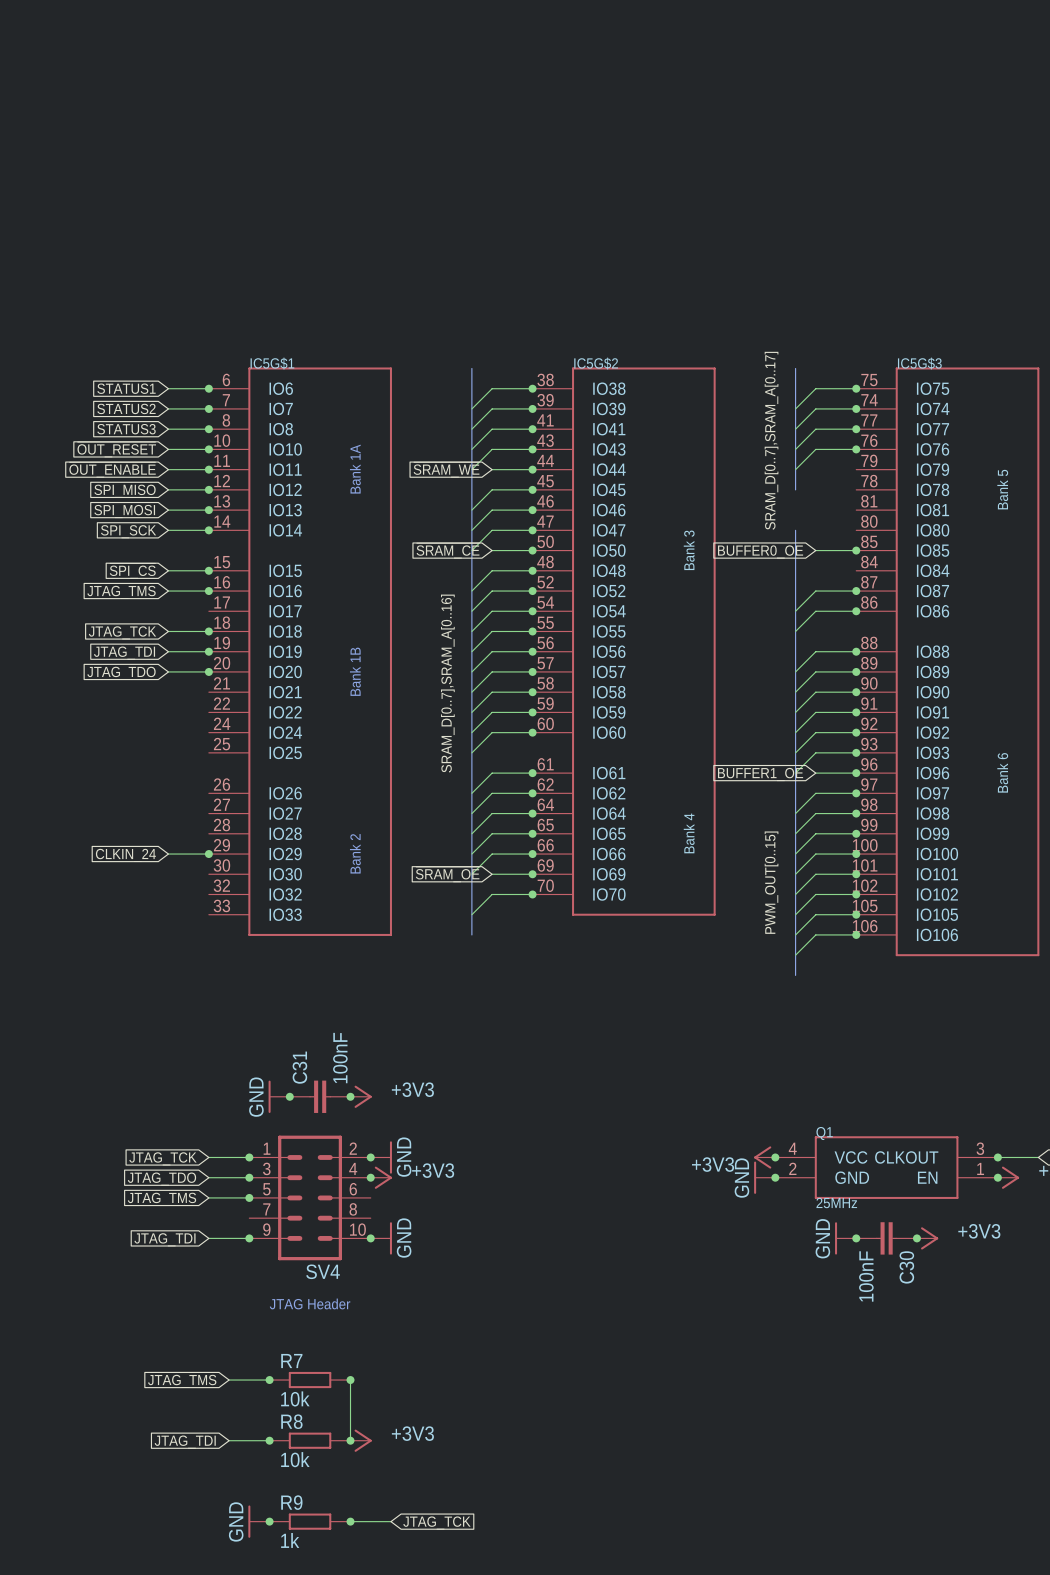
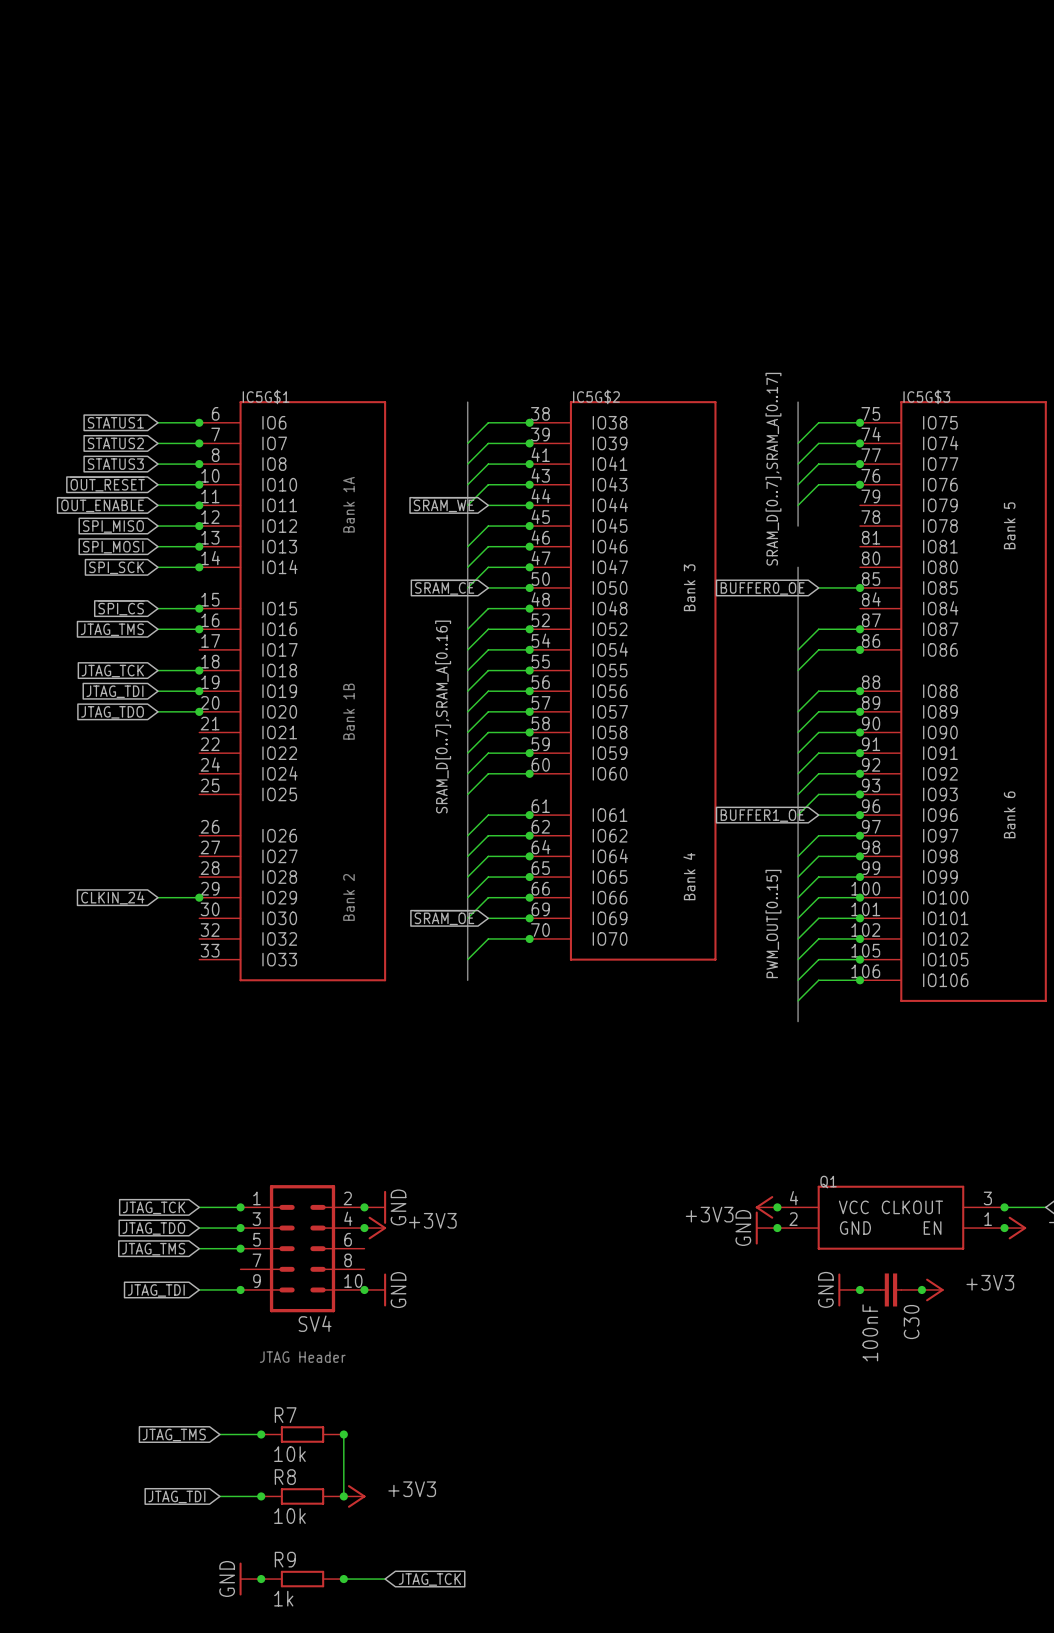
power symbol: GND (279, 1096) -> none
junction: (289, 1096) -> none
C31: 100nF (320, 1096) -> none
junction: (350, 1096) -> none
power symbol: +3V3 (361, 1096) -> none
Q1 value: 25MHz (836, 1203) -> none

